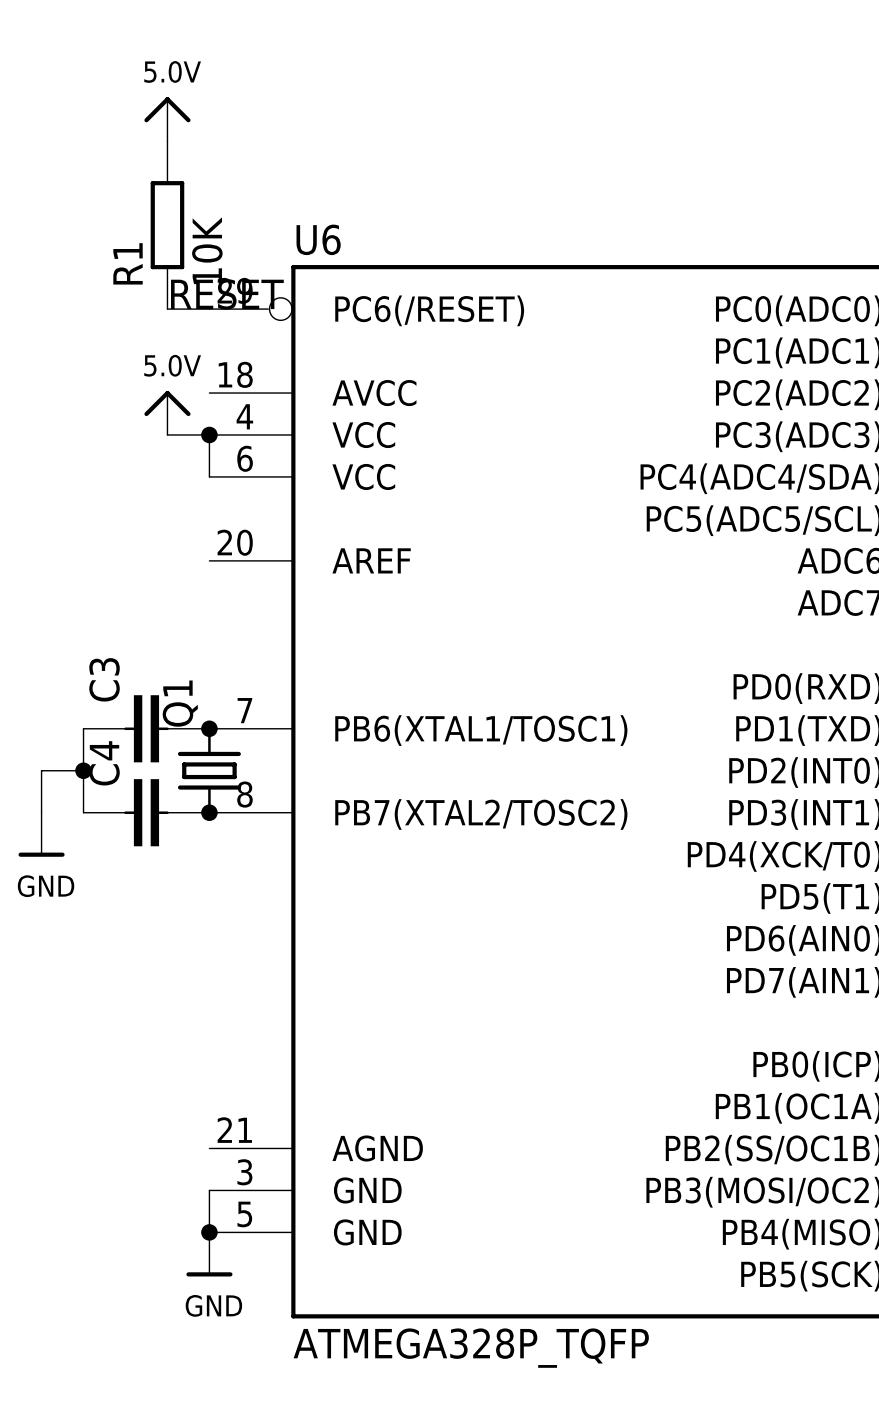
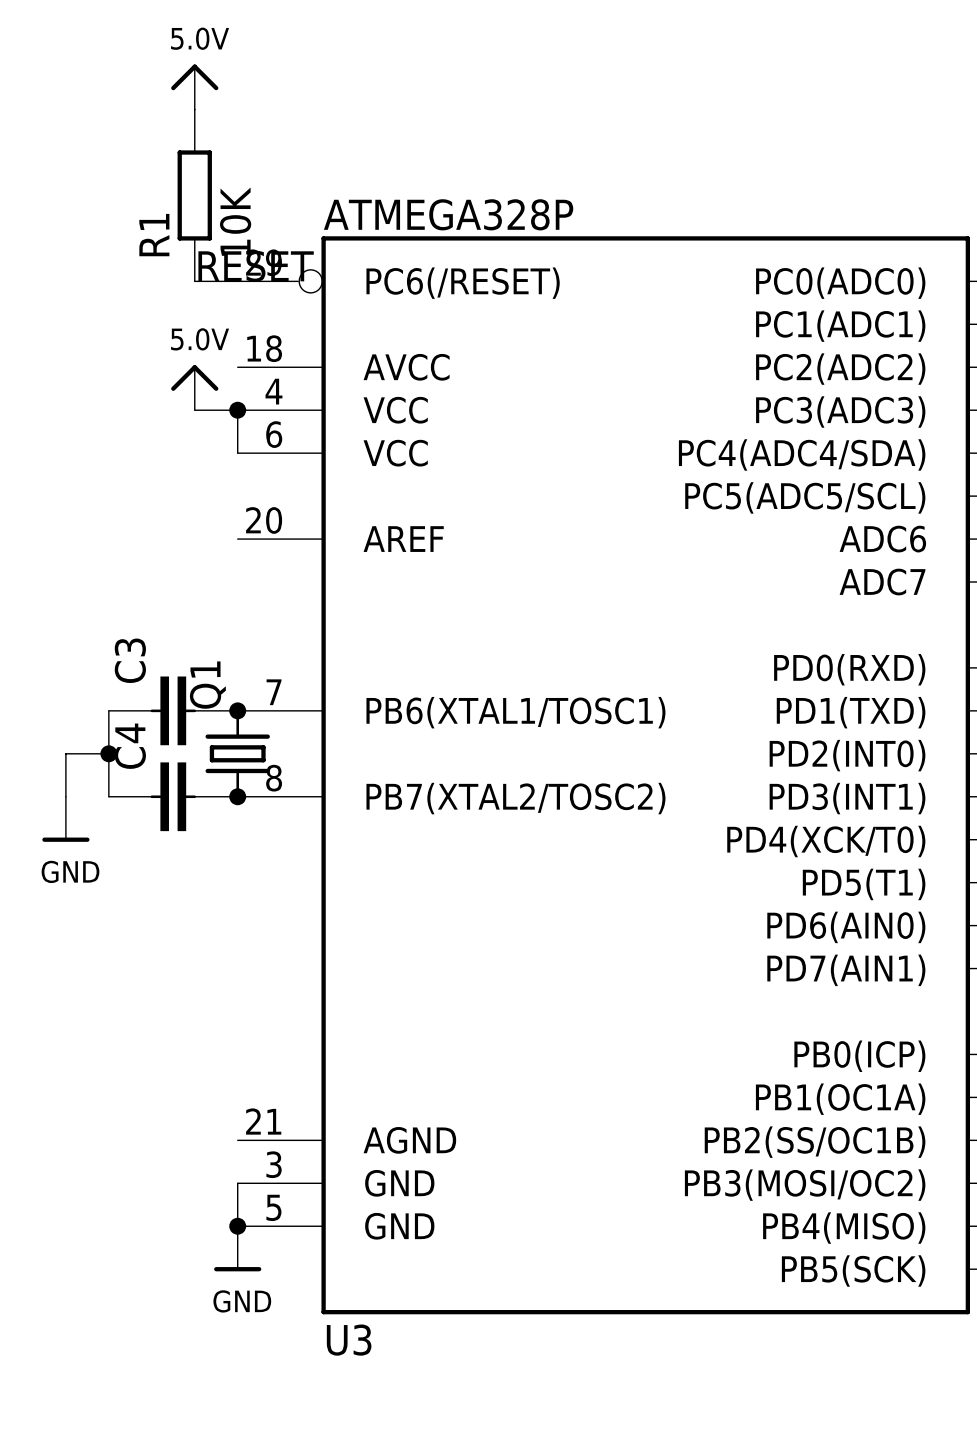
U6 name: U6 (318, 239) -> U3 (349, 1340)
U6 value: ATMEGA328P_TQFP (471, 1348) -> ATMEGA328P (448, 214)

